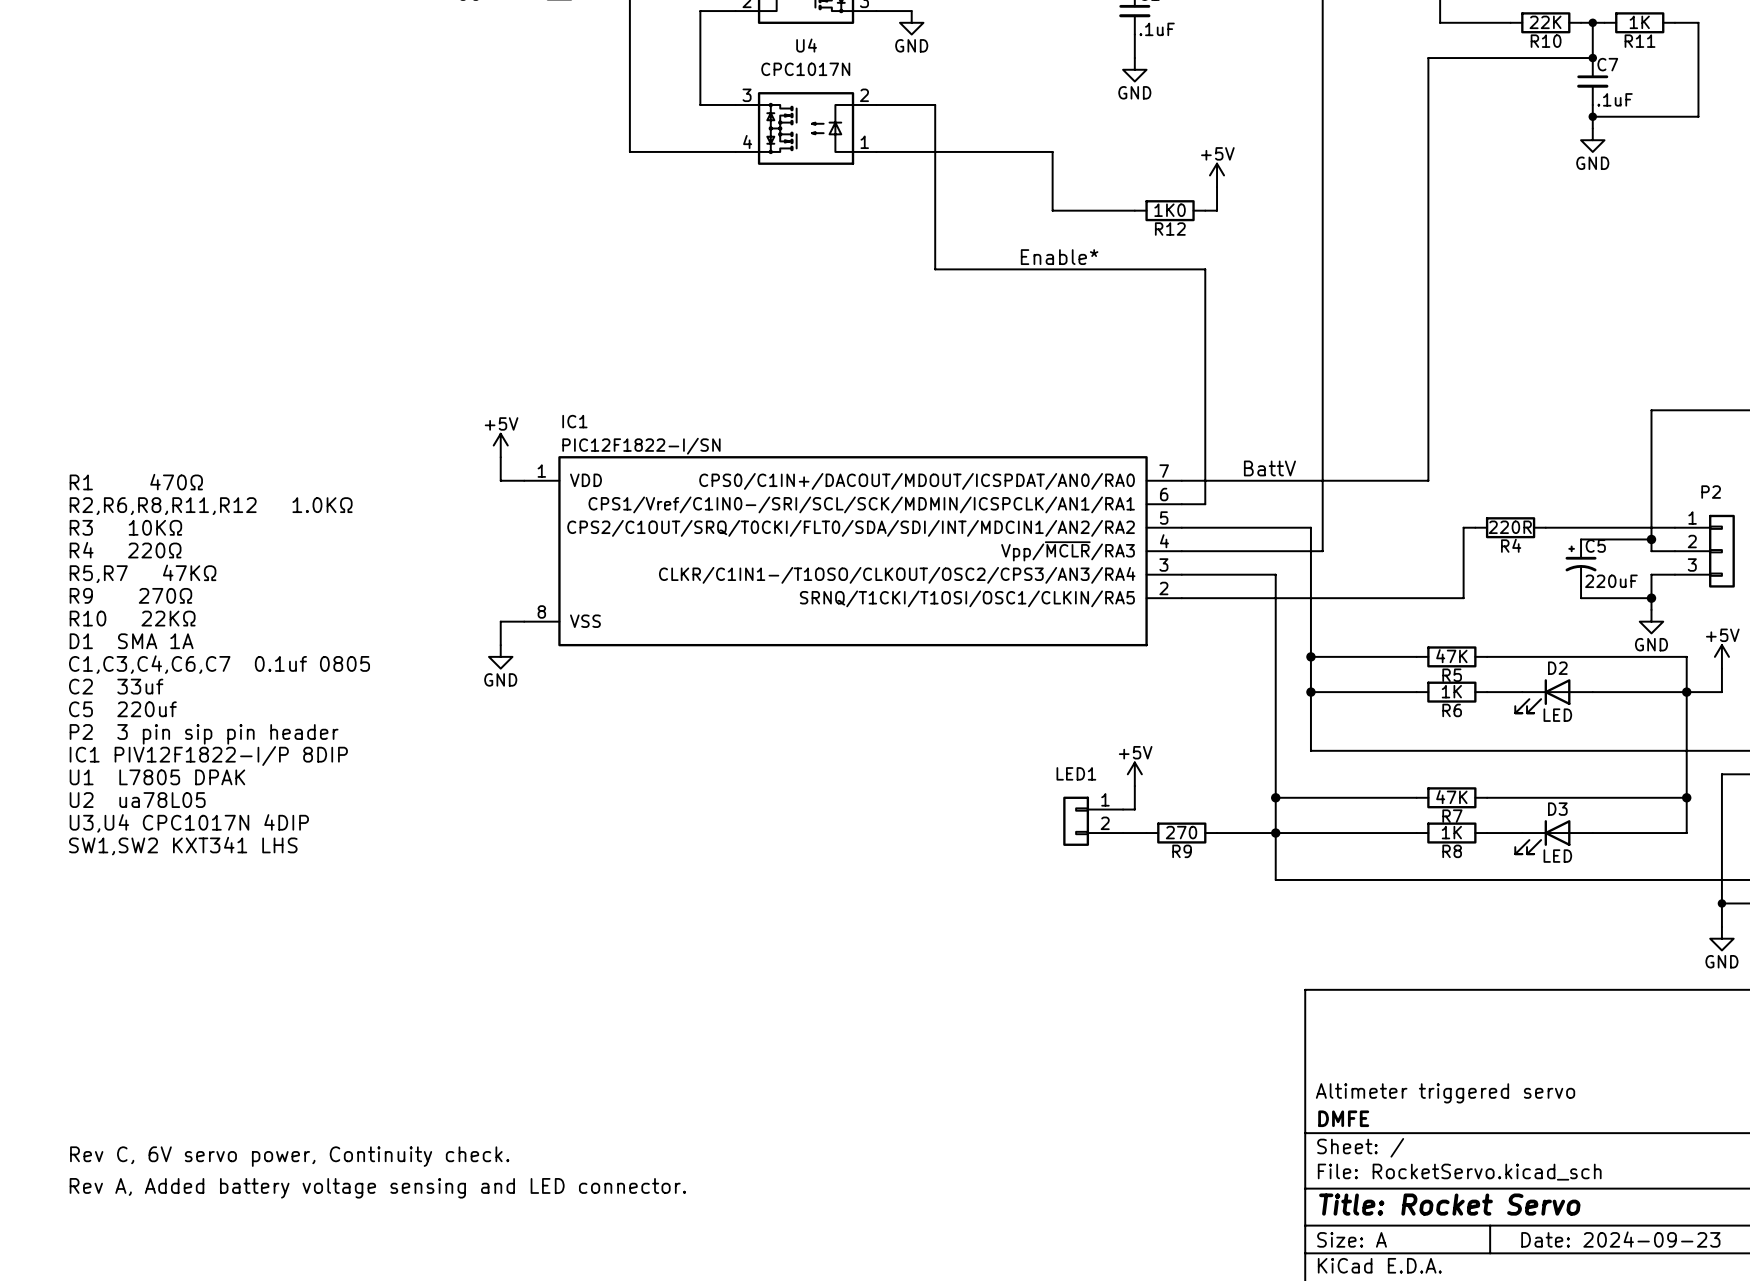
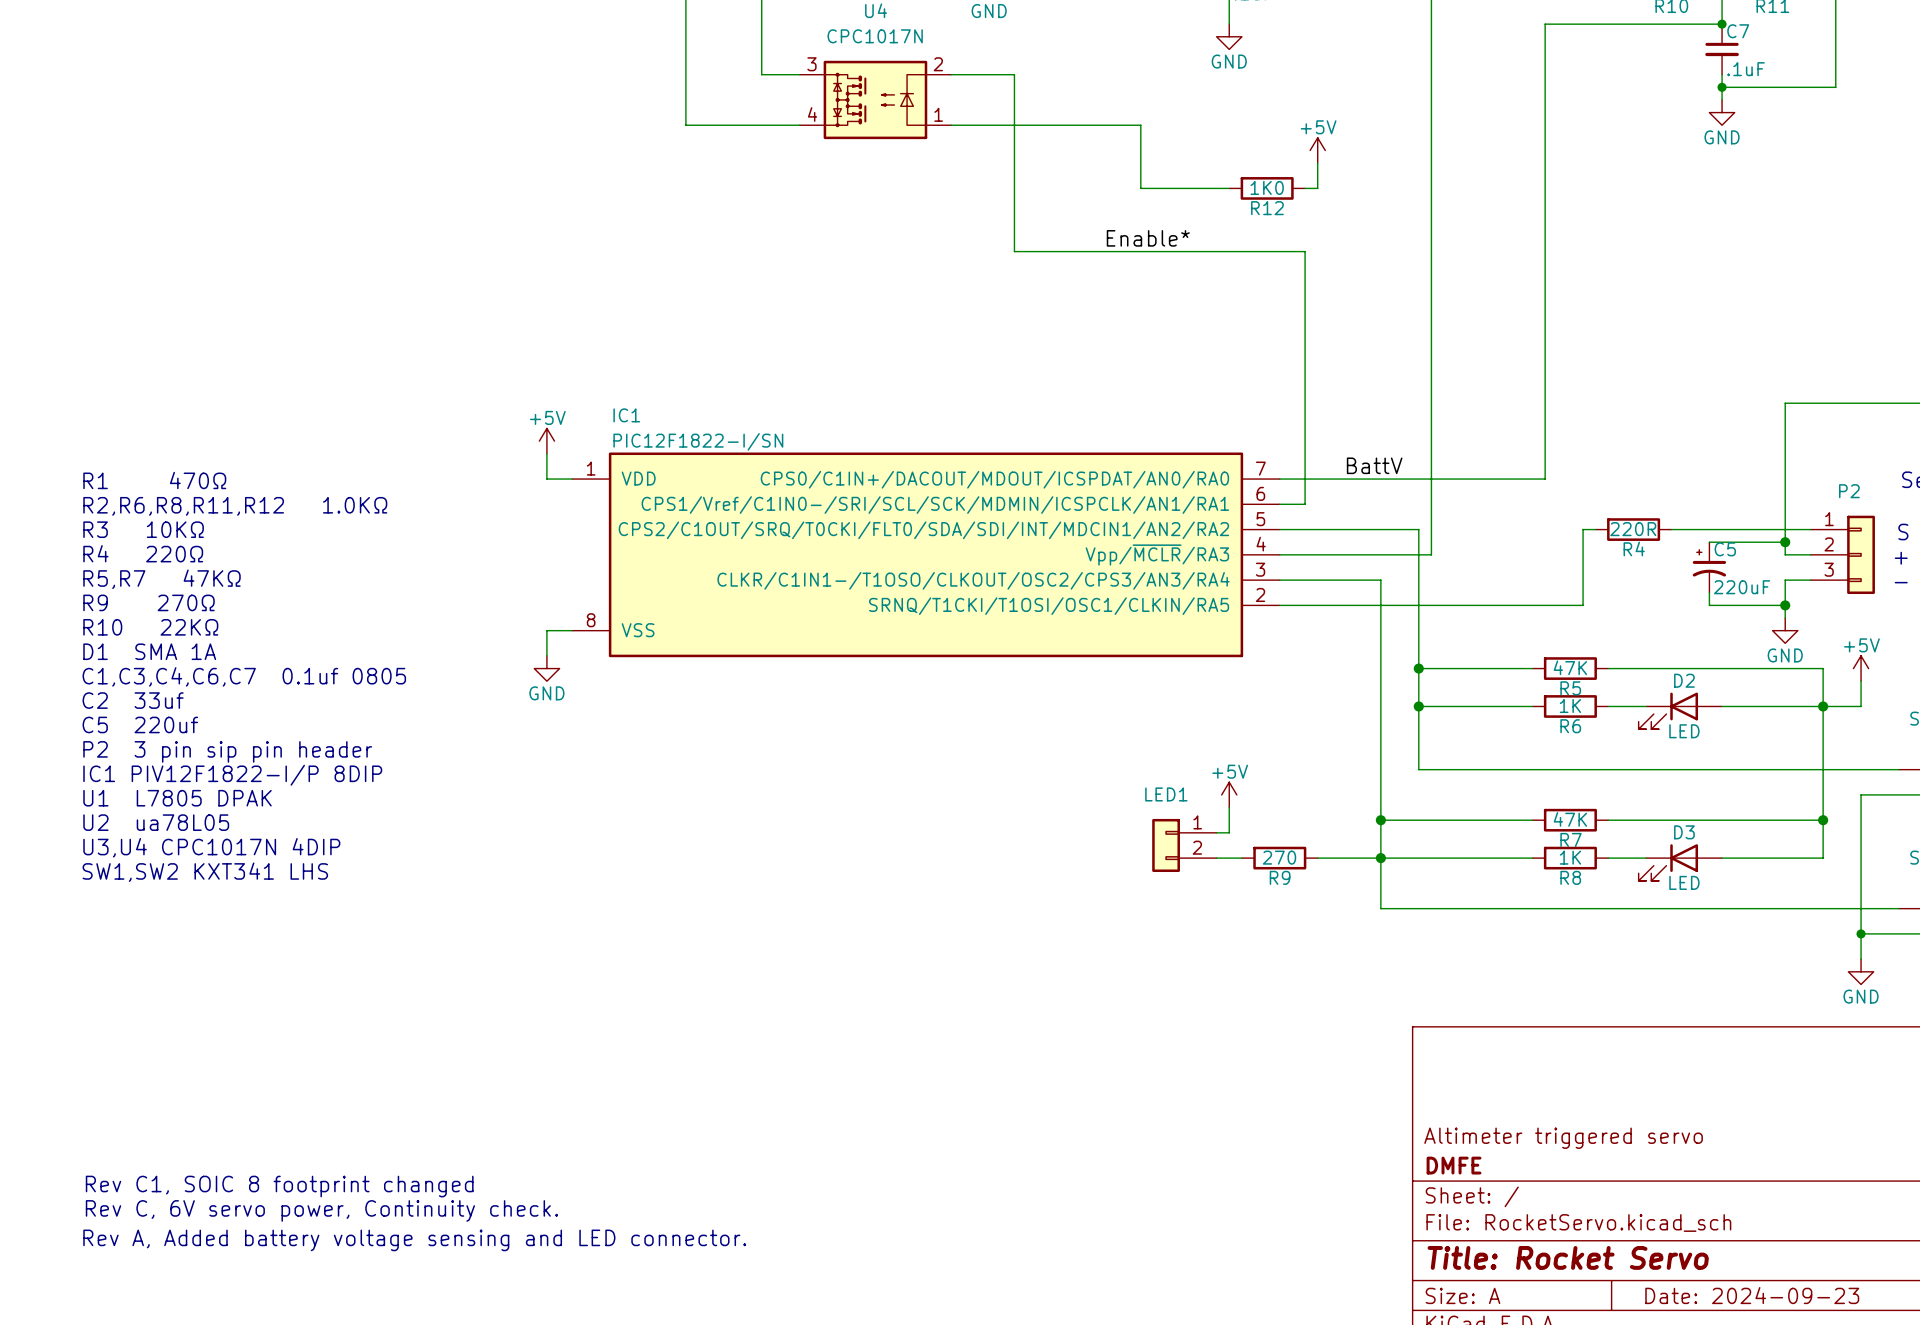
text: none -> Rev C1, SOIC 8 footprint changed (279, 1186)
text position: Rev C, 6V servo power, Continuity check. (289, 1156) -> Rev C, 6V servo power, Continuity check. (321, 1210)

